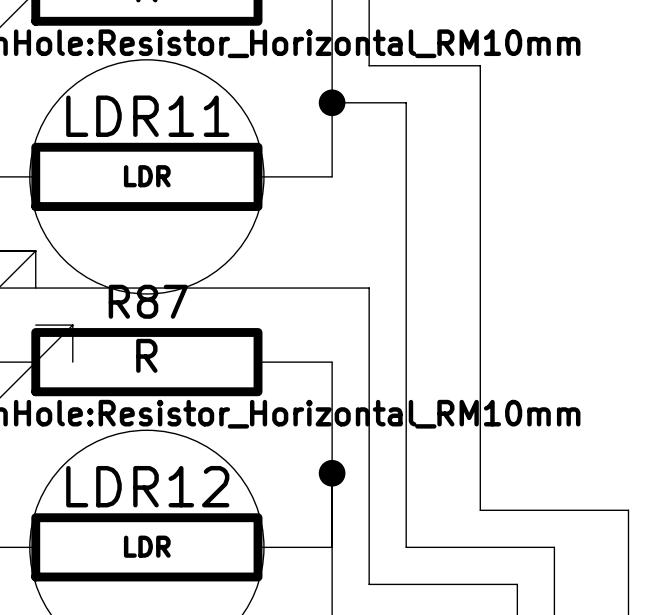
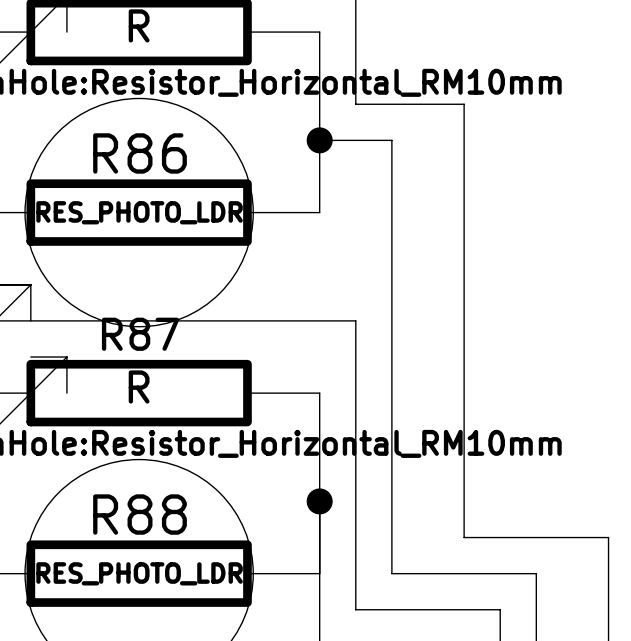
LDR11 name: LDR11 (147, 116) -> R86 (140, 153)
LDR11 value: LDR (147, 176) -> RES_PHOTO_LDR (139, 212)
LDR12 name: LDR12 (147, 486) -> R88 (140, 514)
LDR12 value: LDR (147, 546) -> RES_PHOTO_LDR (139, 573)

